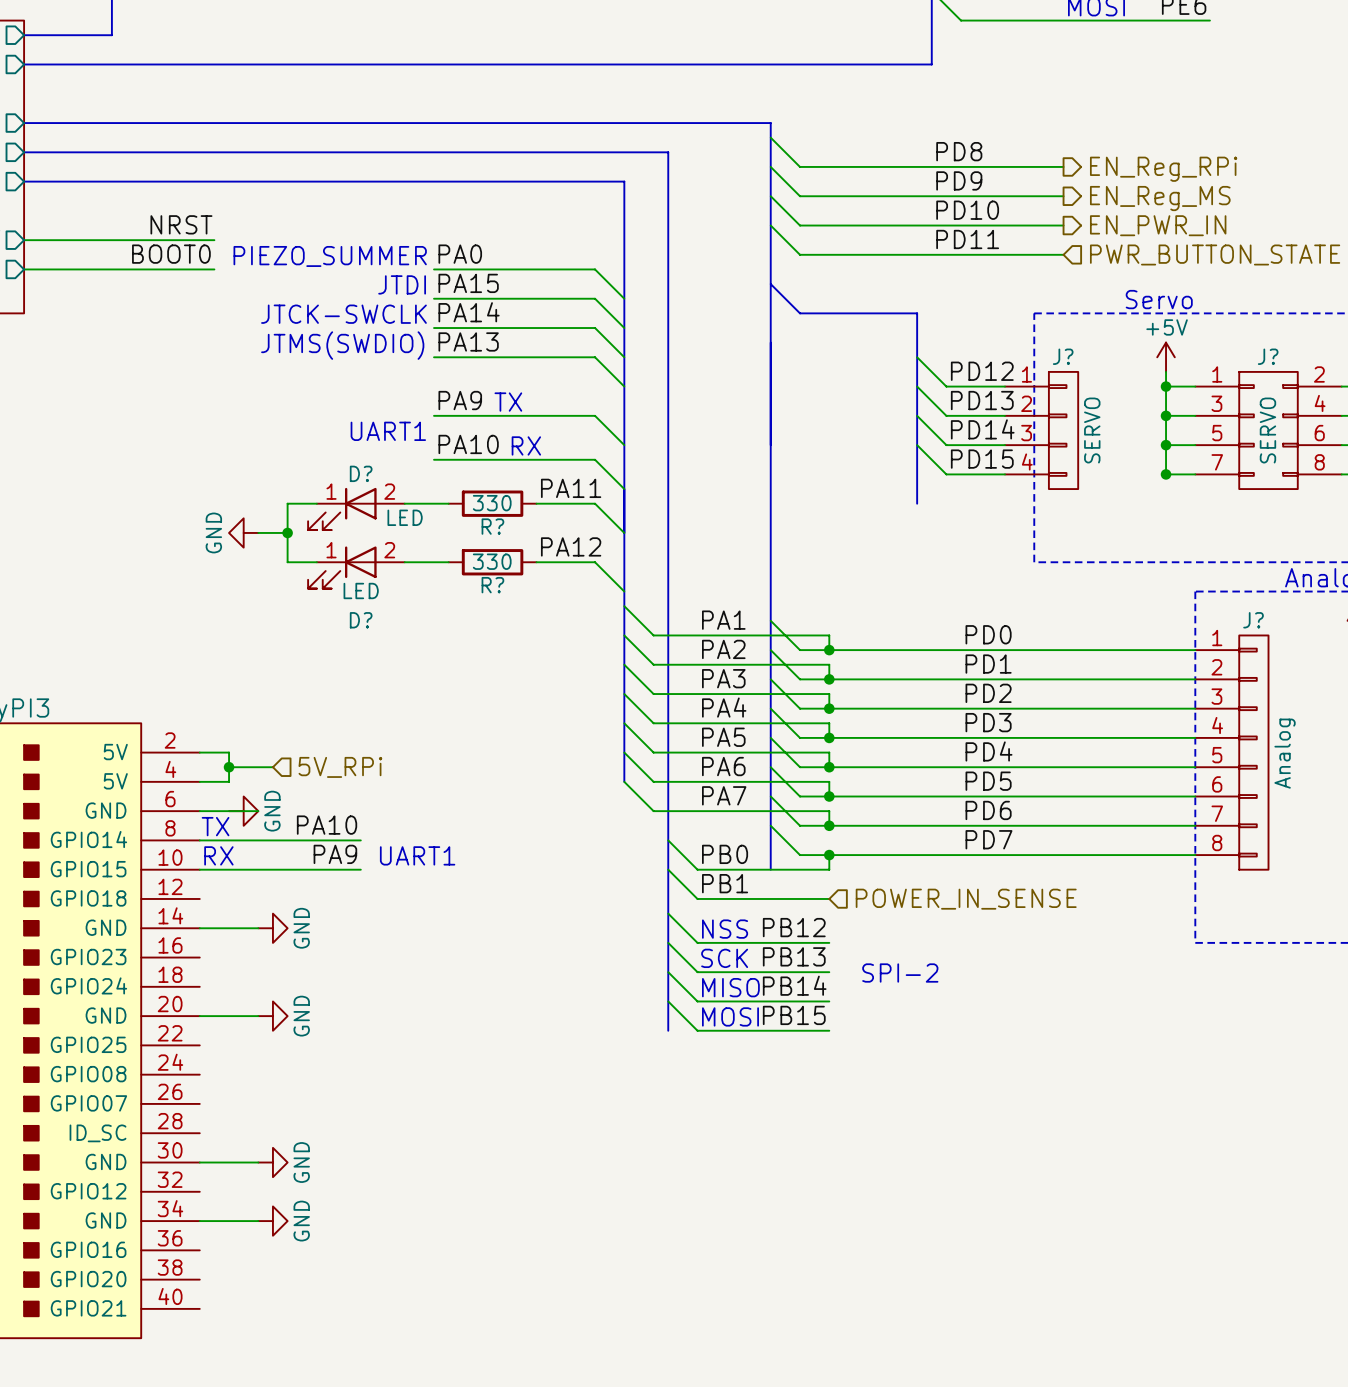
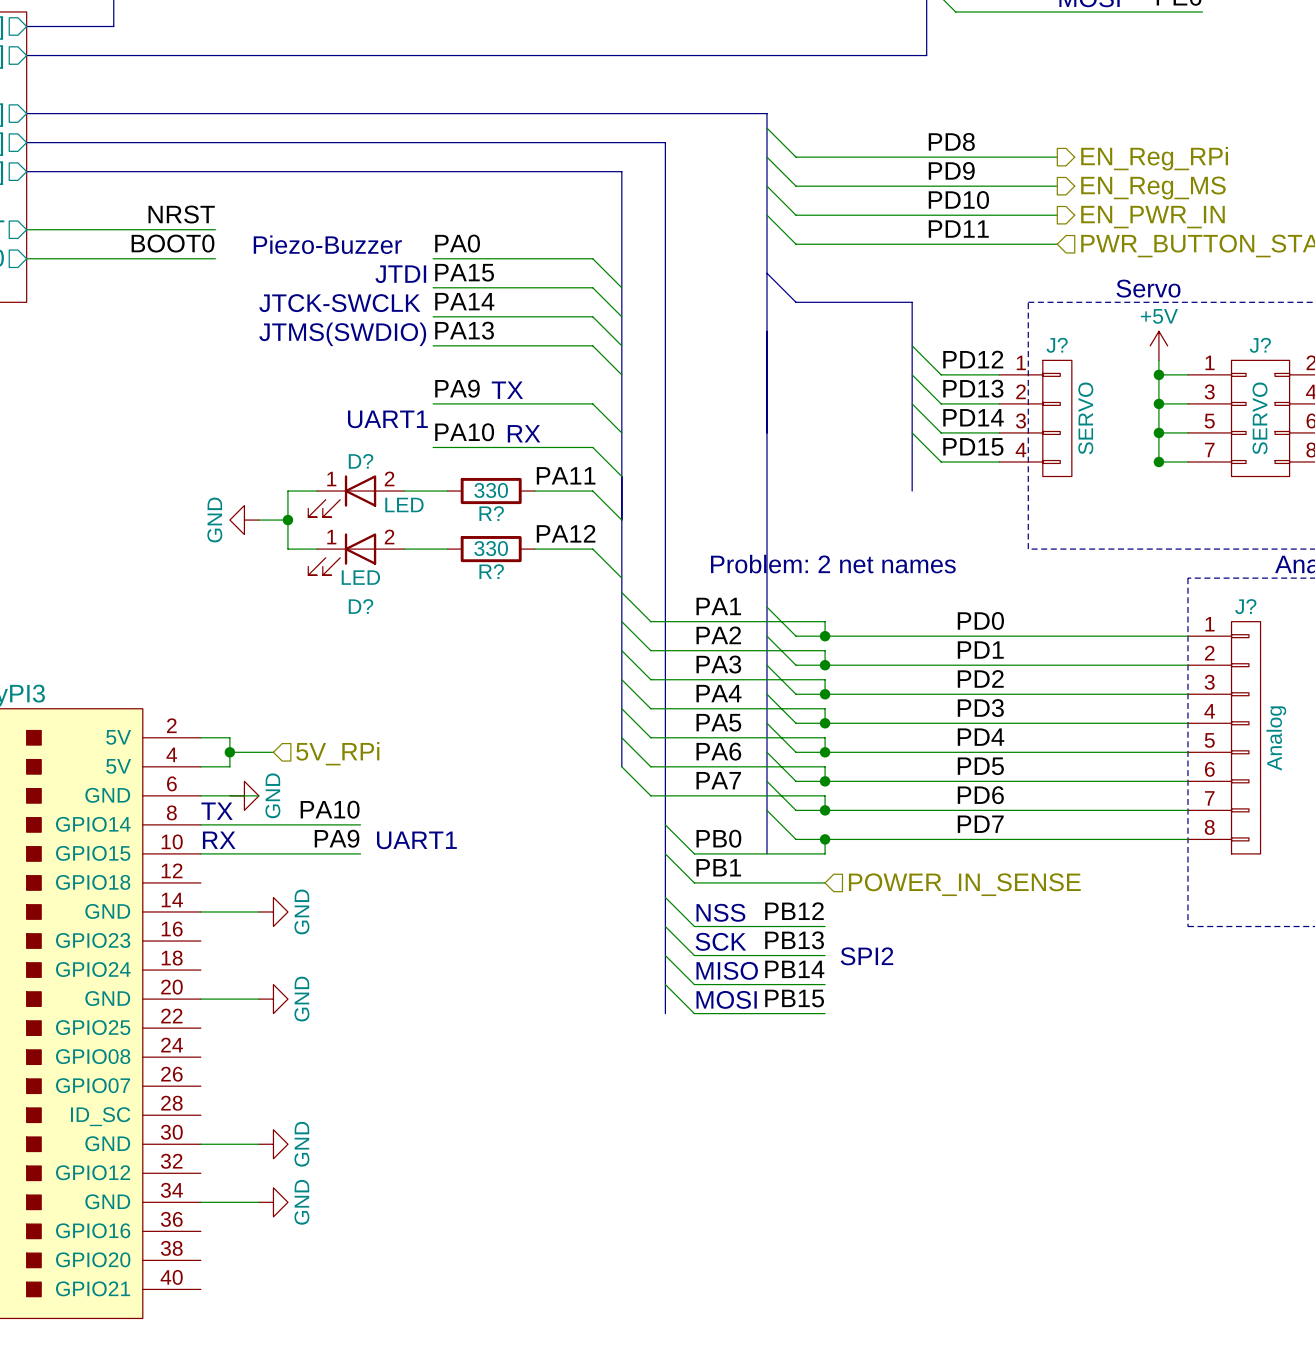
text: none -> Piezo-Buzzer (327, 244)
text: PIEZO_SUMMER (330, 256) -> none
text: none -> Problem: 2 net names (833, 564)
text: SPI-2 (900, 973) -> SPI2 (866, 956)

